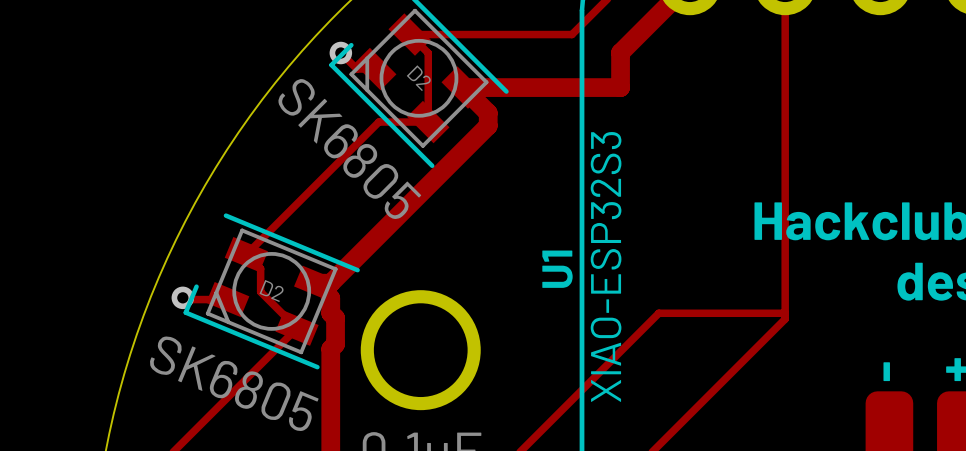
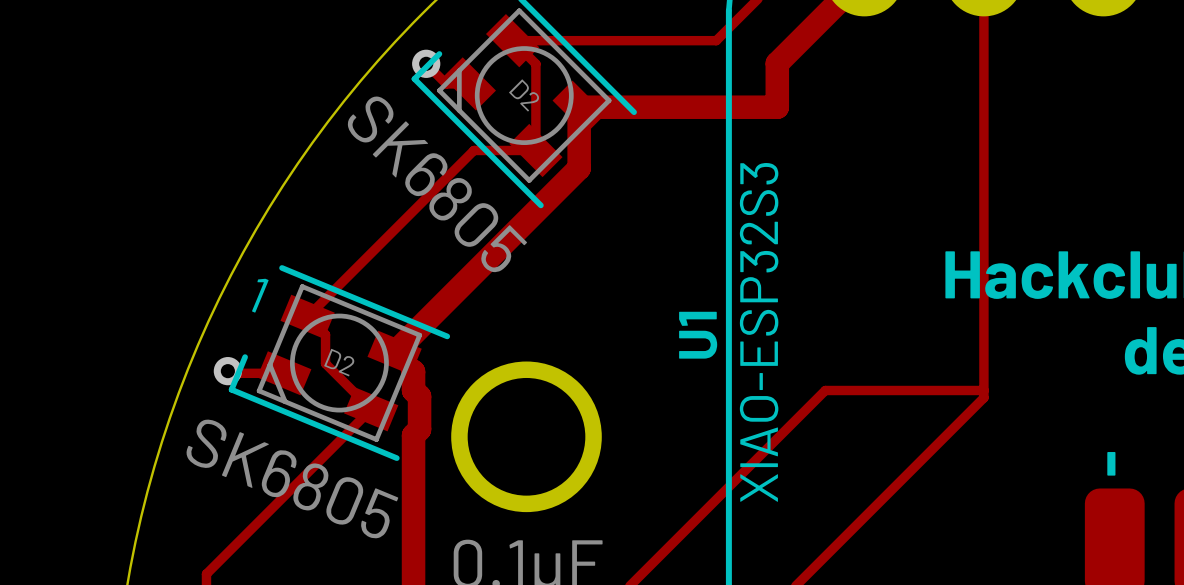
track: (462, 87) (488, 113) (488, 125) (330, 283) (315, 283) -> (579, 107) (579, 168) (394, 352)
D2 text: none -> 1 (260, 295)

